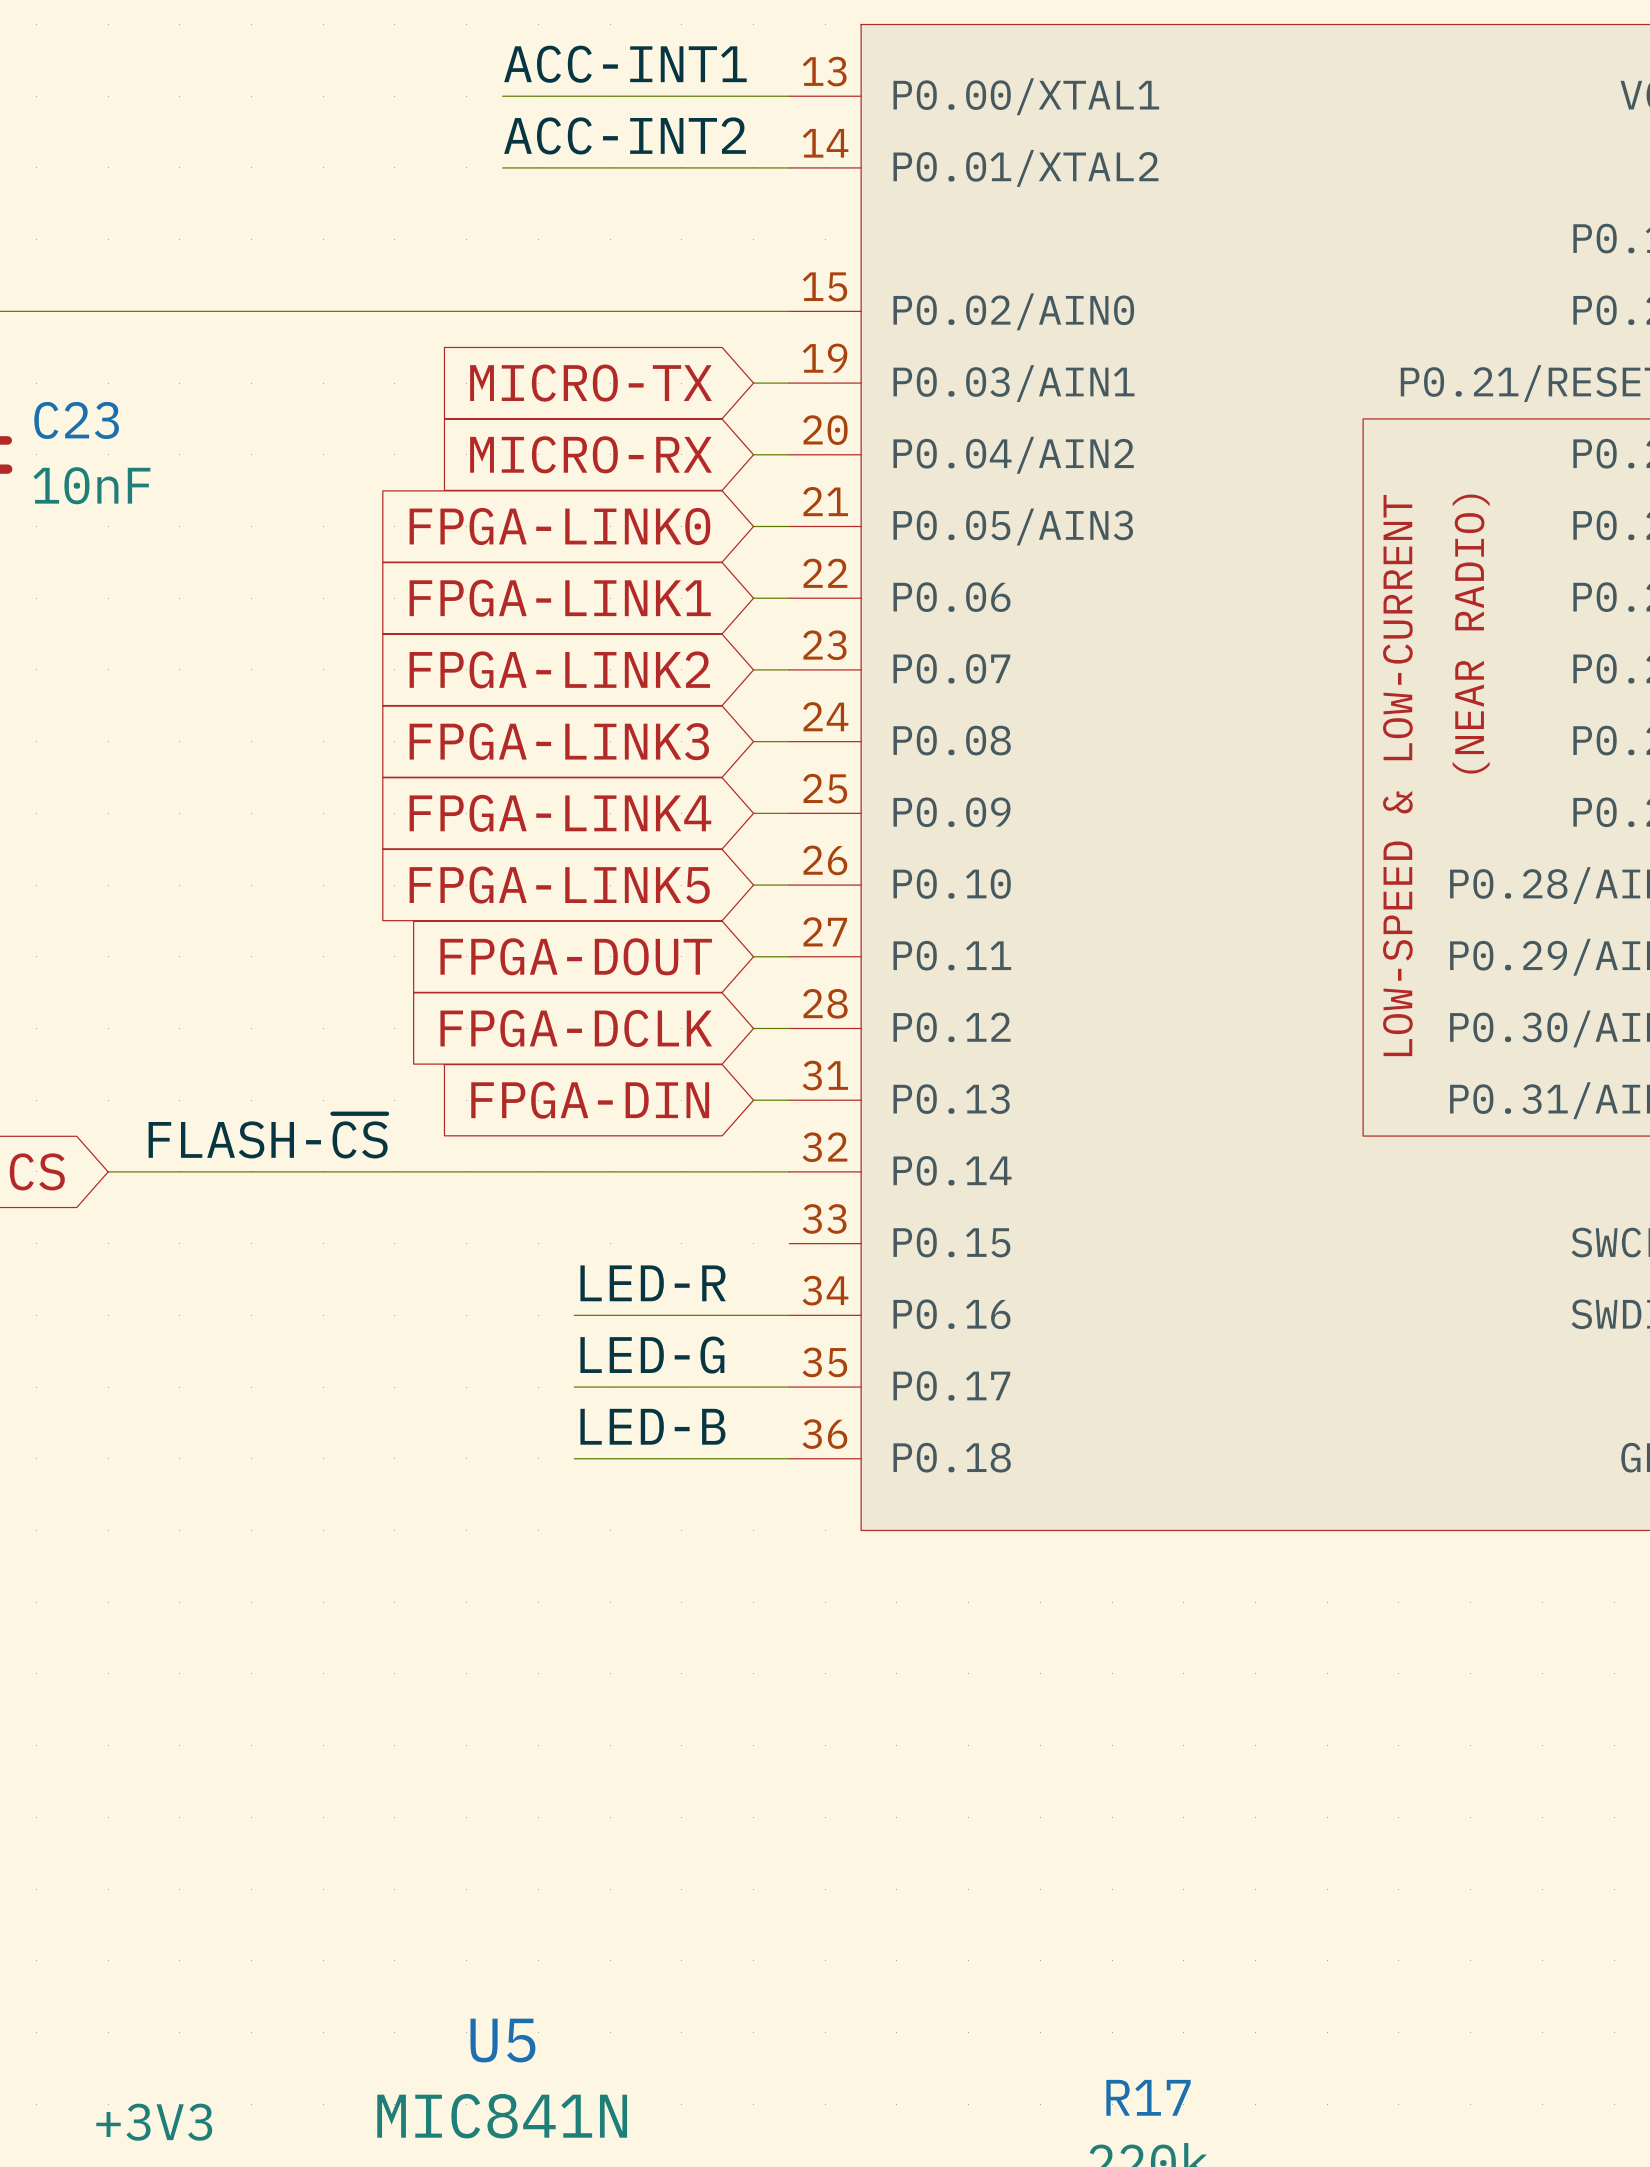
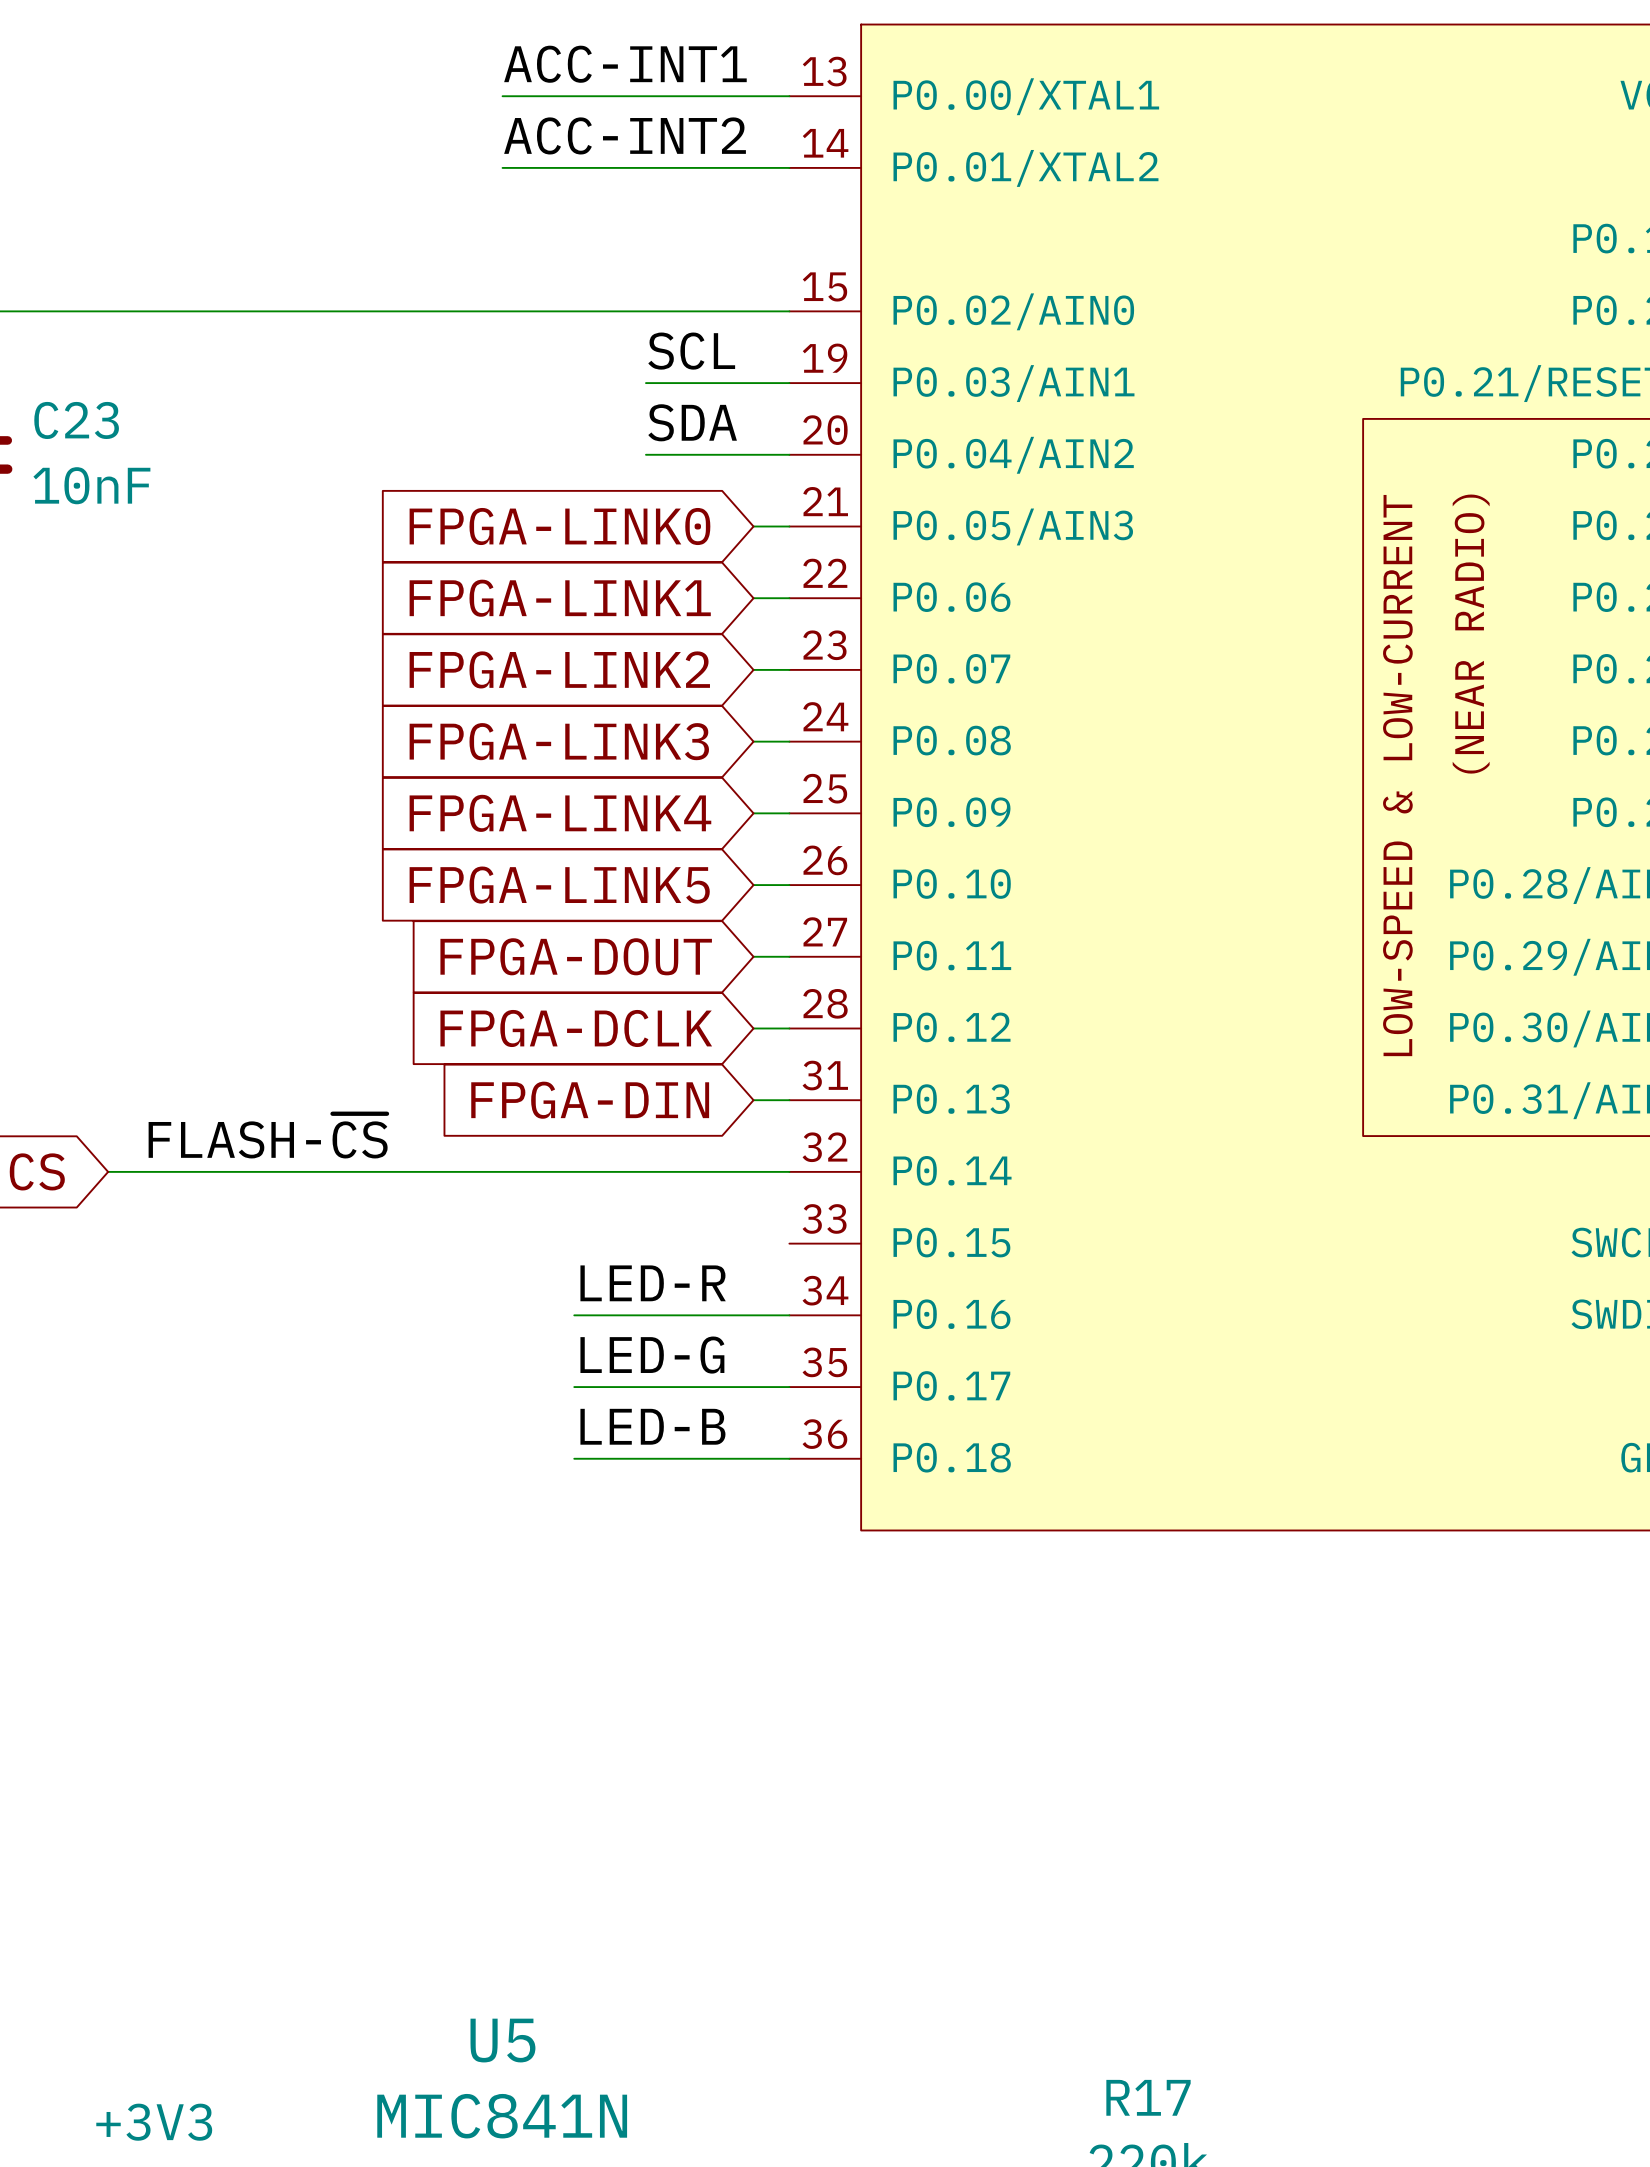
label: none -> SCL (691, 351)
global label: MICRO-TX (591, 383) -> none
wire: none -> (645, 383) (753, 383)
label: none -> SDA (692, 422)
global label: MICRO-RX (591, 454) -> none
wire: none -> (645, 454) (753, 454)

